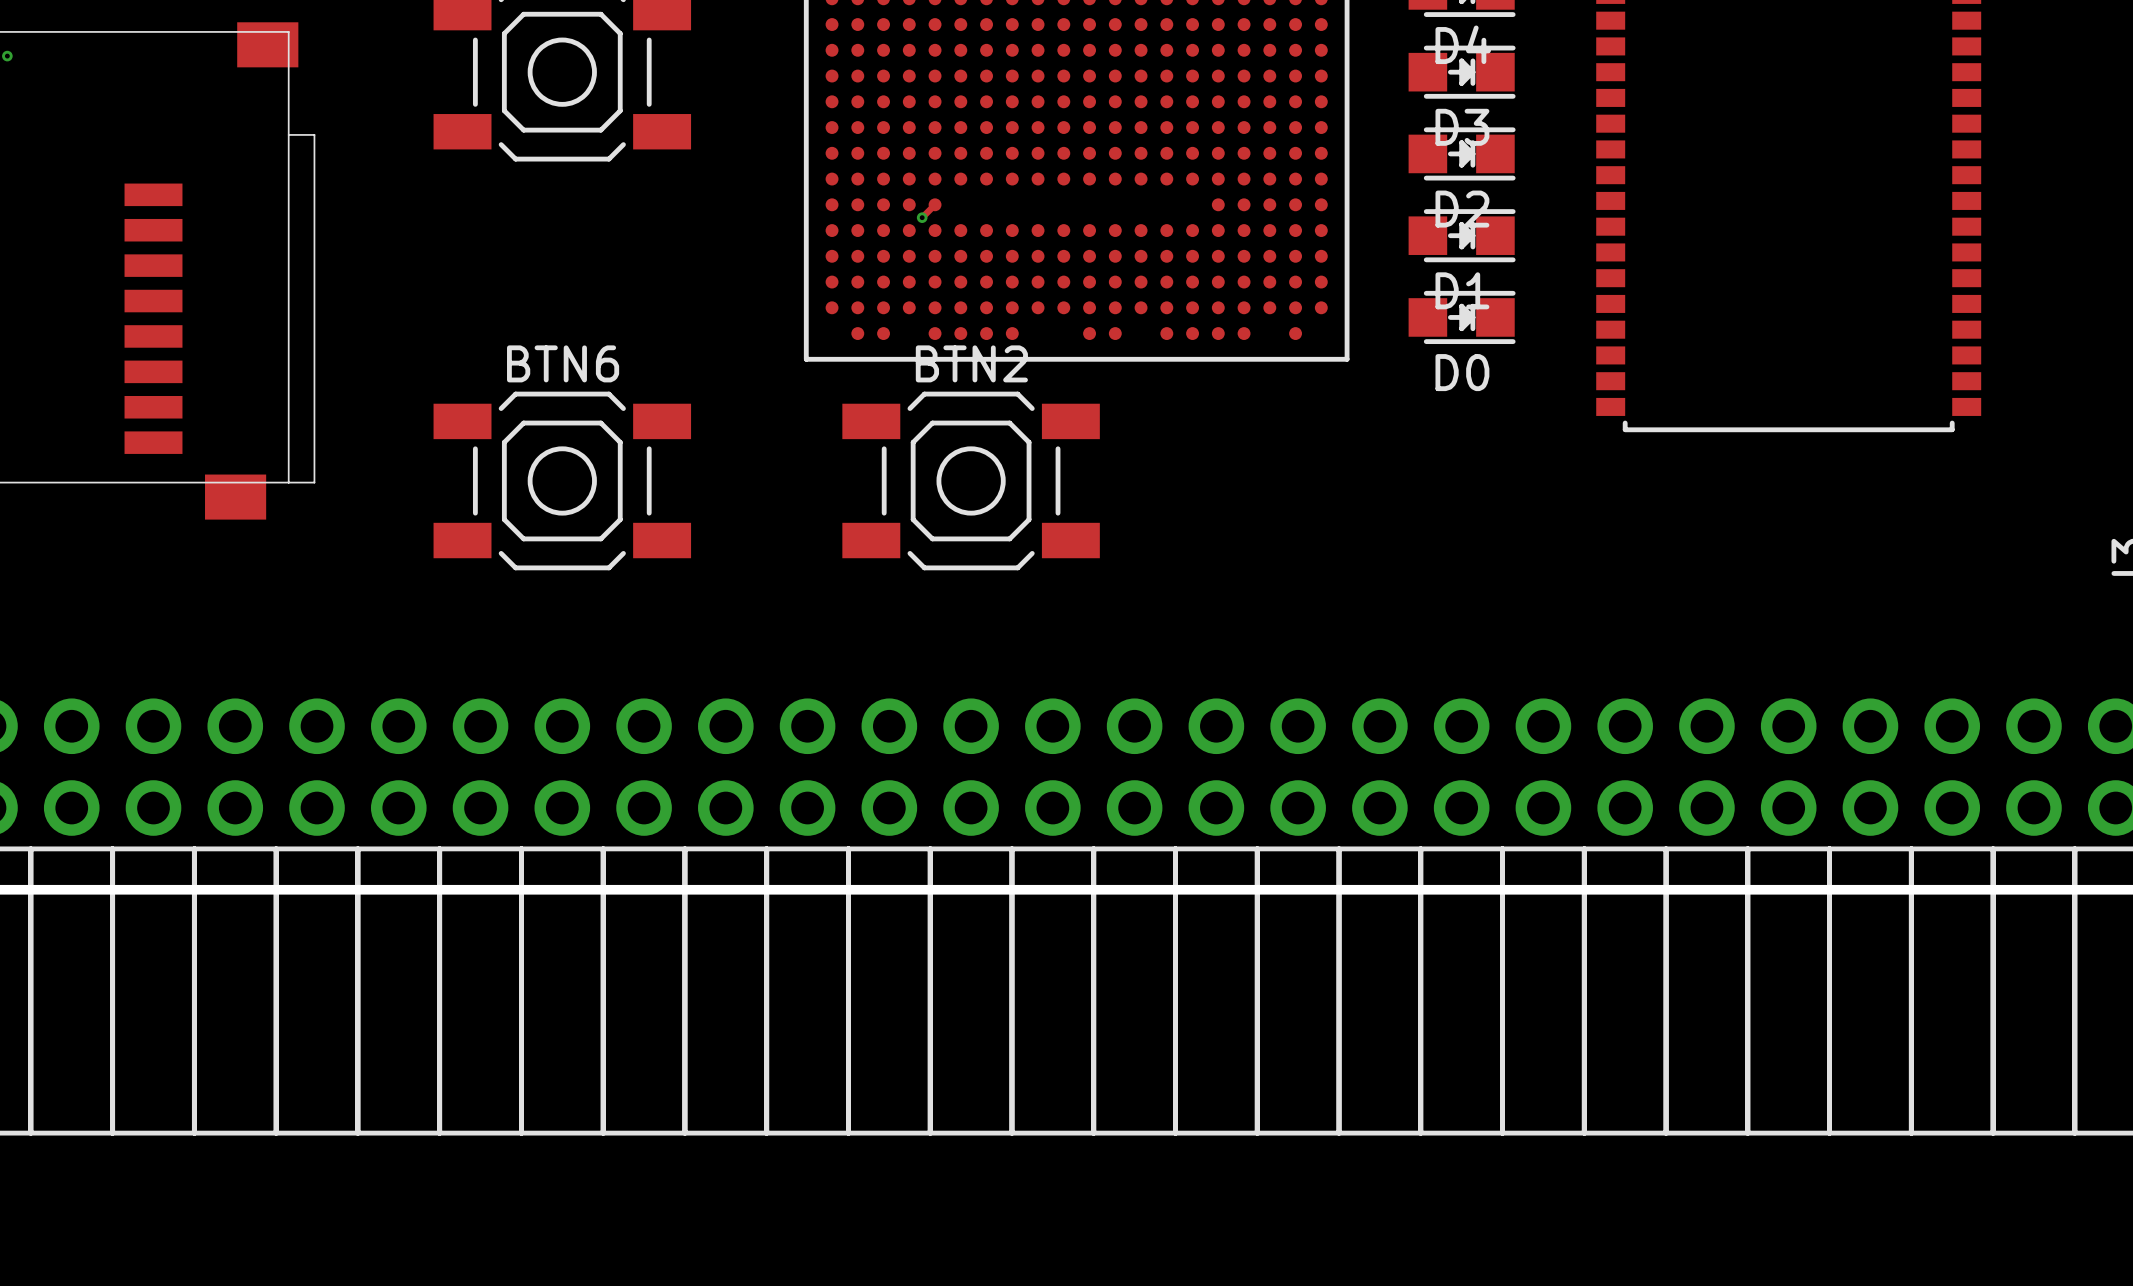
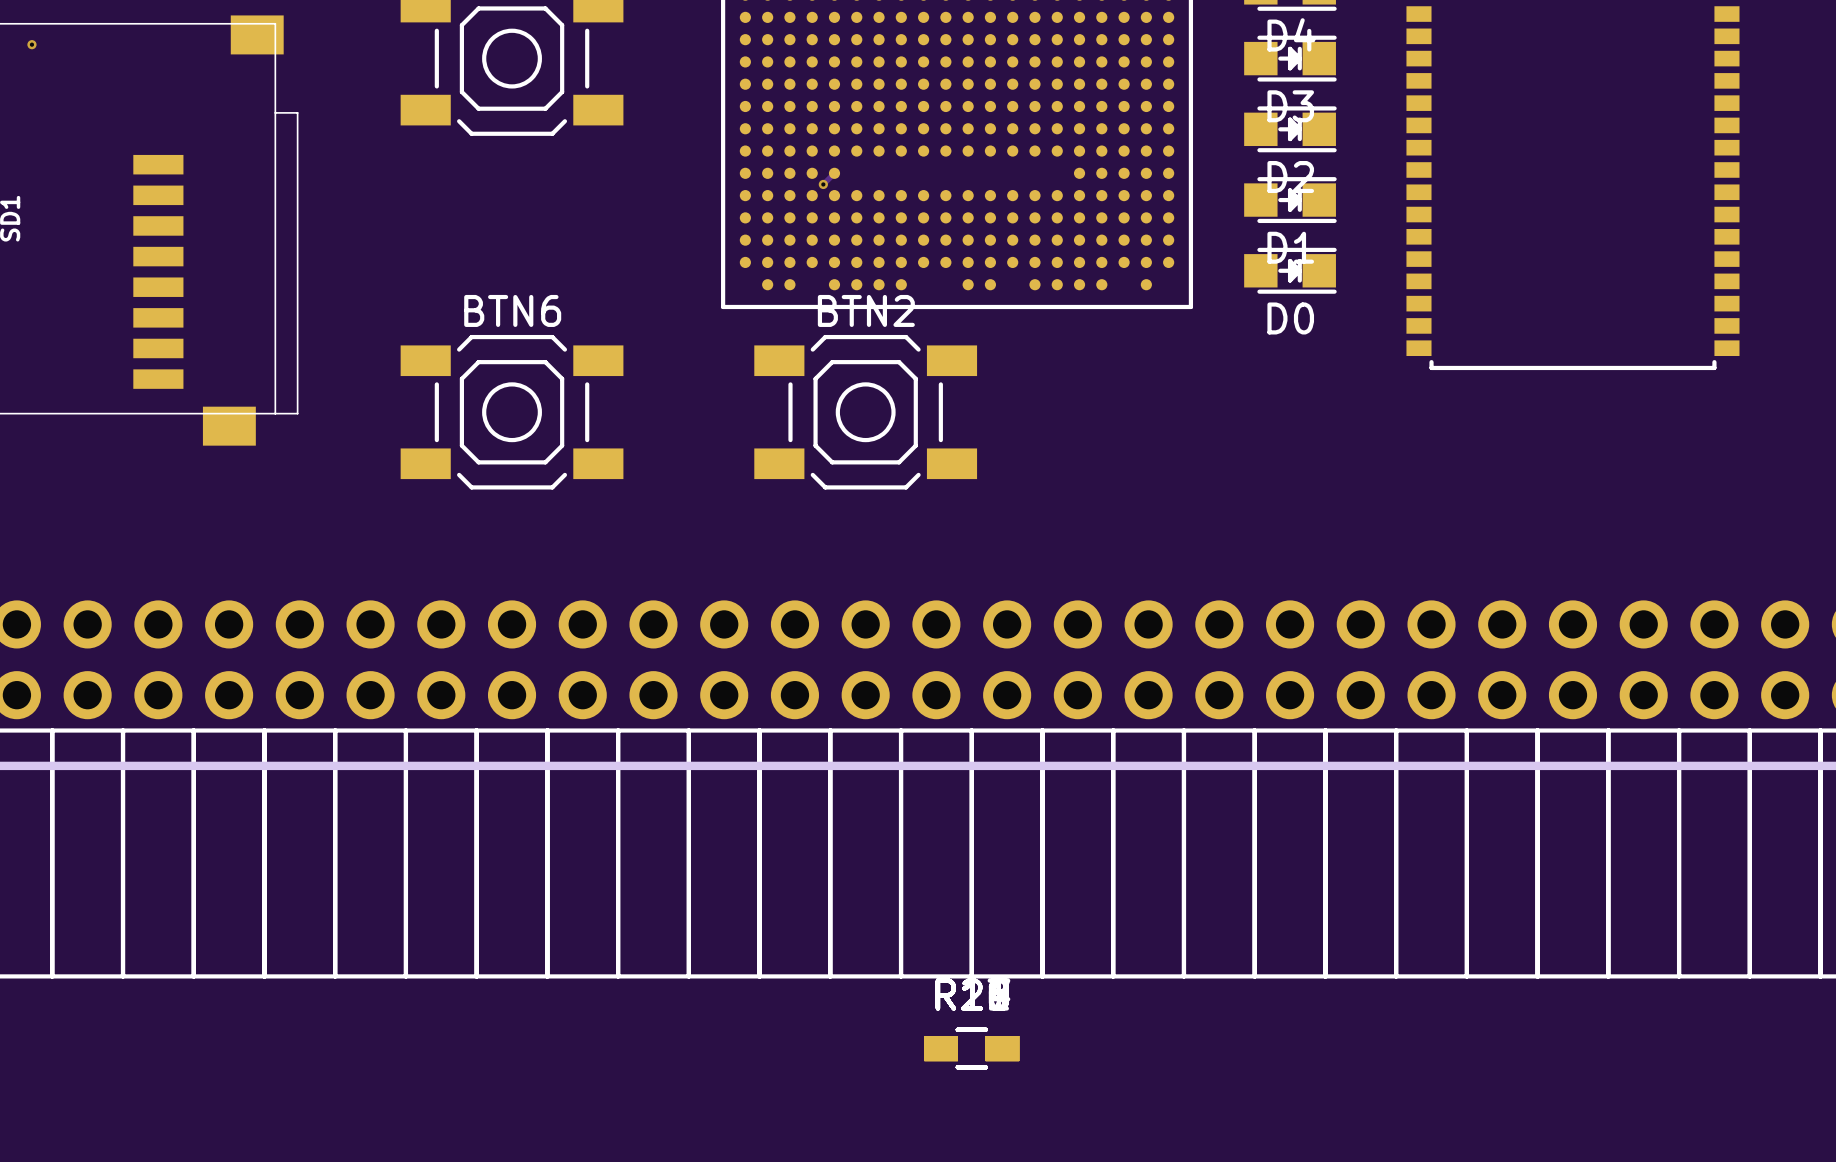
part: none -> (971, 1048)
part: none -> (971, 1048)
part: none -> (971, 1048)
part: none -> (971, 1048)
part: none -> (971, 1048)
part: none -> (971, 1048)
part: none -> (971, 1048)
part: none -> (971, 1048)

